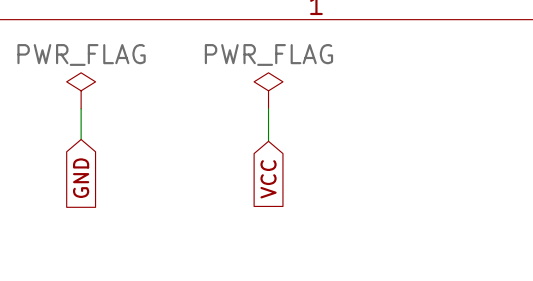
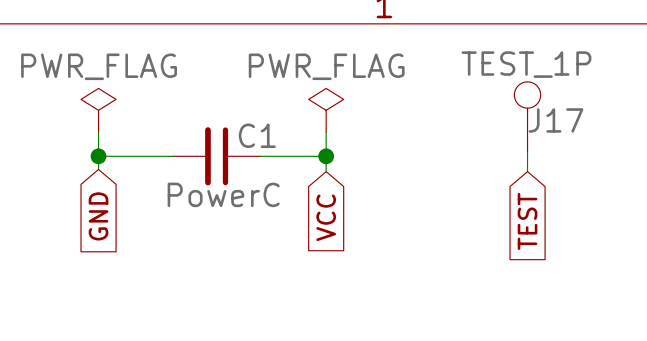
J17: none -> TEST_1P (527, 116)
wire: none -> (527, 151) (527, 171)
wire: none -> (98, 156) (172, 156)
junction: none -> (98, 156)
C1: none -> PowerC (216, 156)
wire: none -> (260, 156) (326, 156)
junction: none -> (326, 156)
global label: none -> TEST (527, 221)

